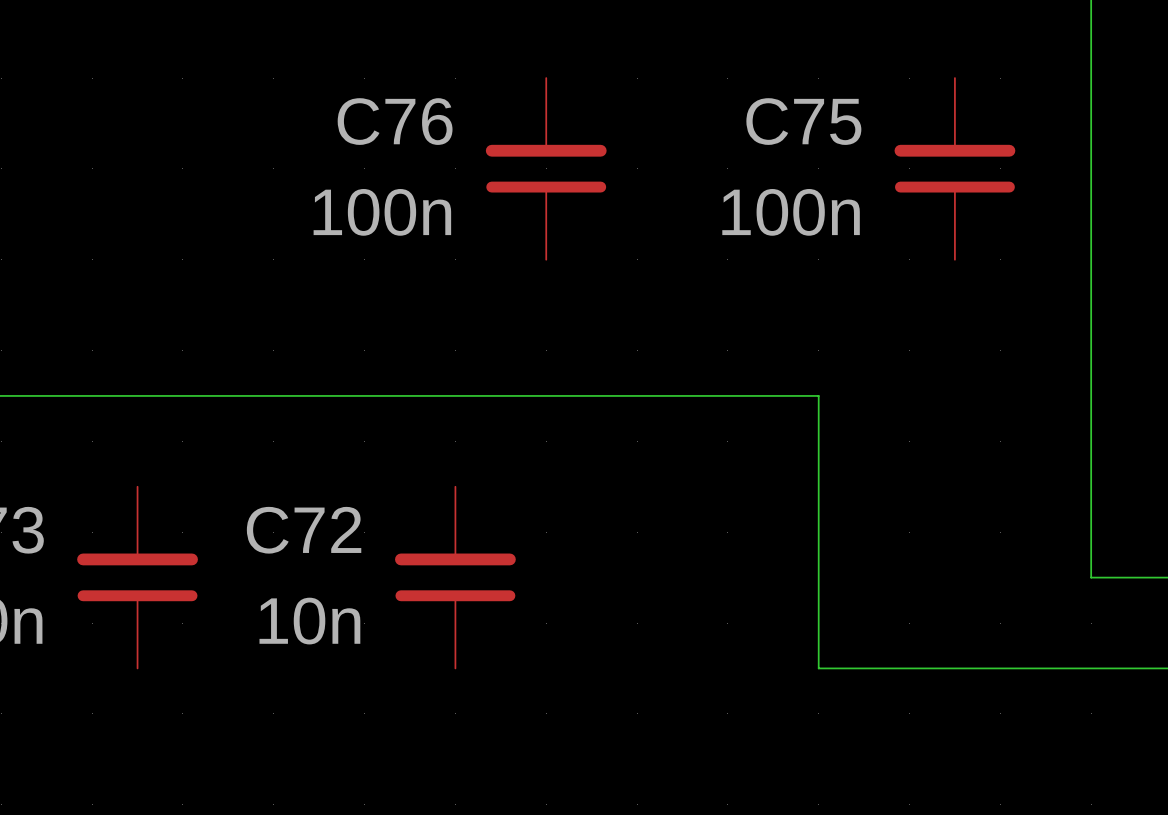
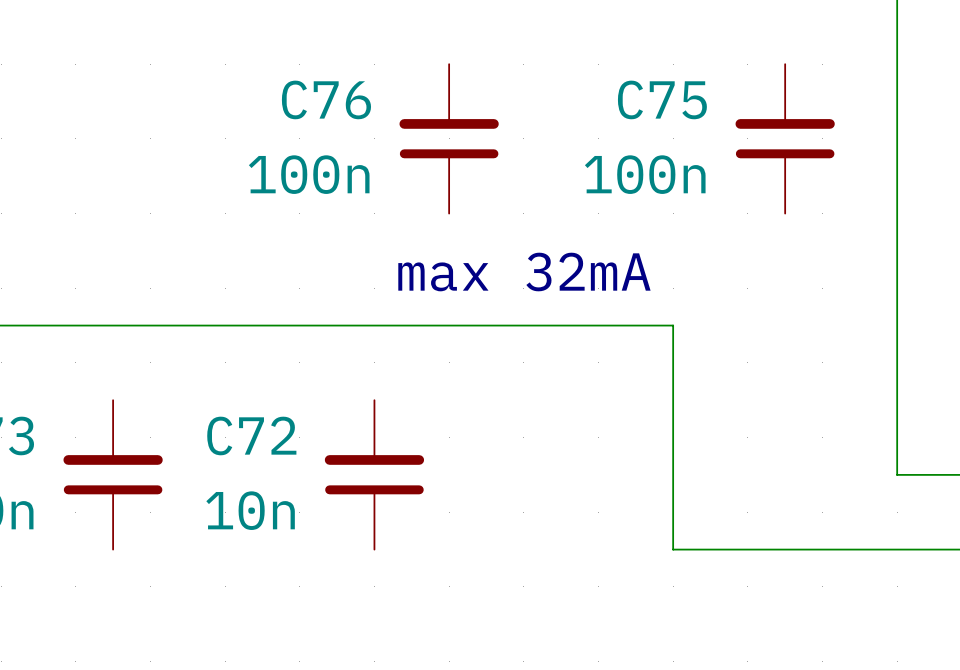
text: none -> max 32mA (524, 272)

